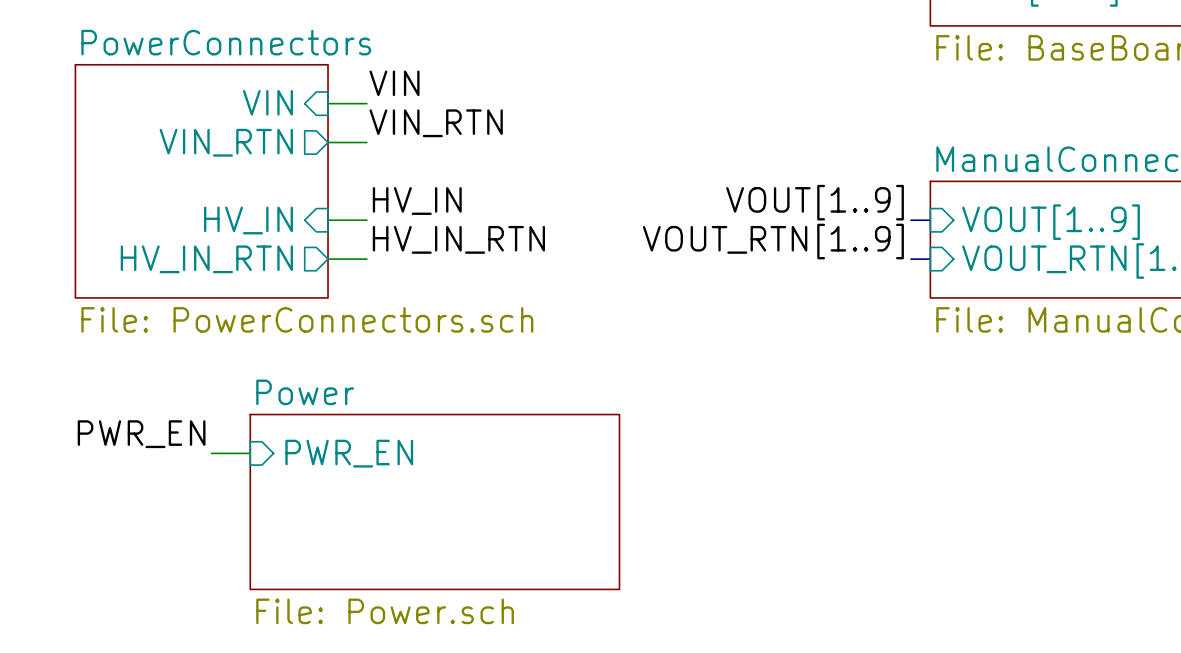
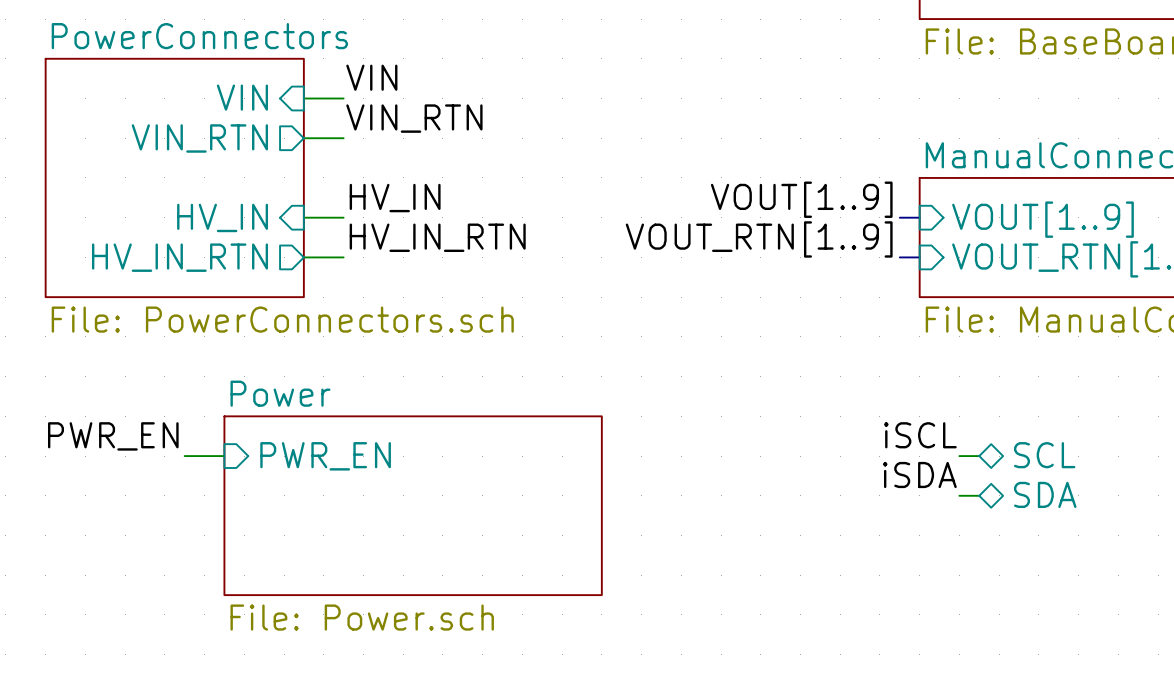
label: none -> iSCL (920, 435)
sheet pin: none -> SCL (1044, 455)
wire: none -> (959, 456) (979, 456)
label: none -> iSDA (919, 475)
sheet pin: none -> SDA (1045, 494)
wire: none -> (959, 495) (979, 495)

